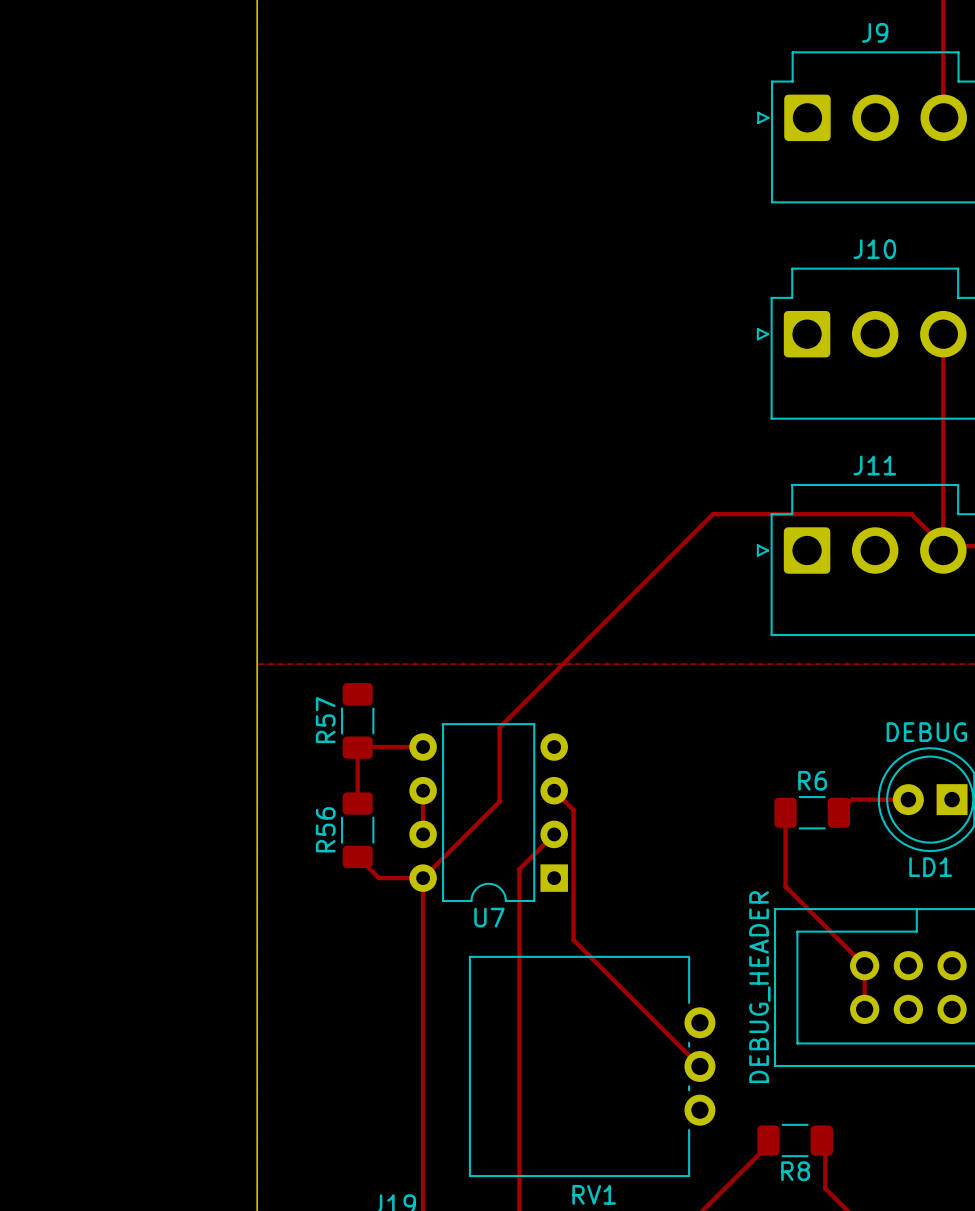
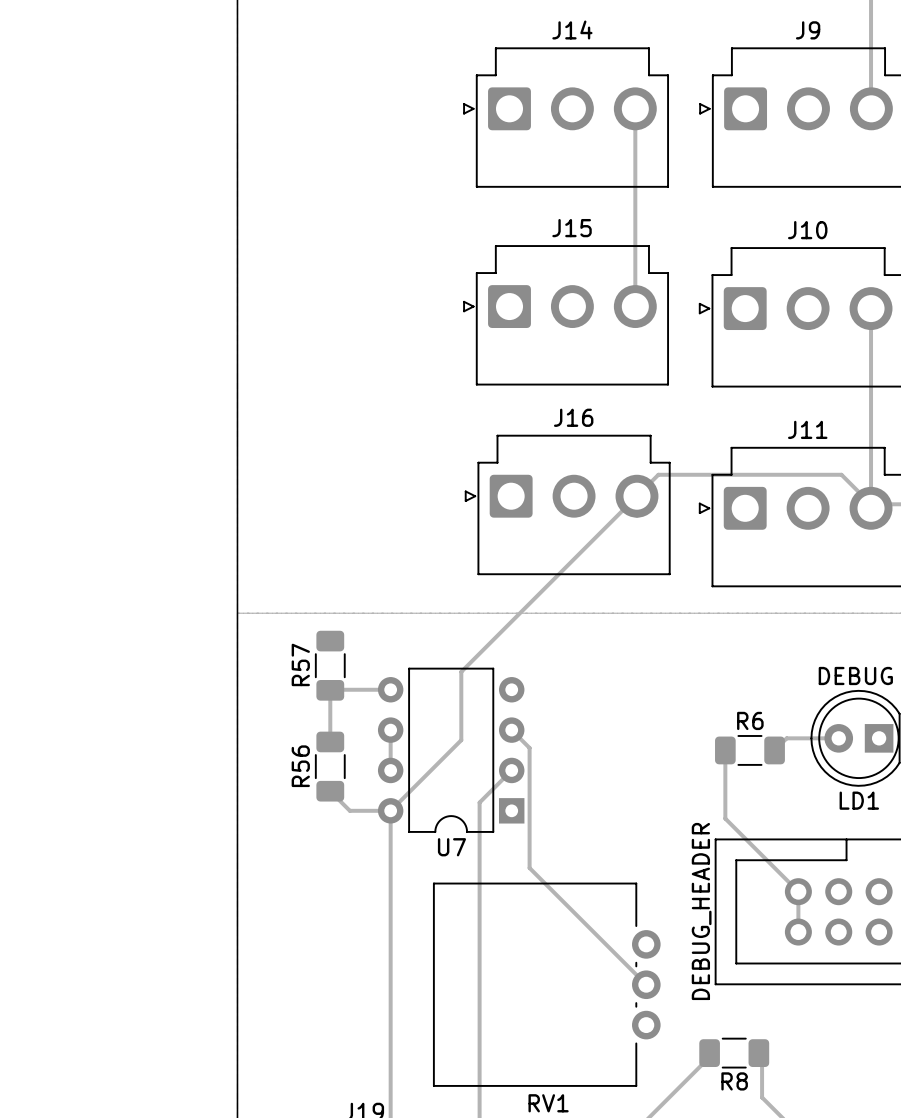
track: none -> (633, 107) (635, 108) (635, 306)
J14: none -> (566, 117)
J15: none -> (566, 315)
J16: none -> (567, 504)

